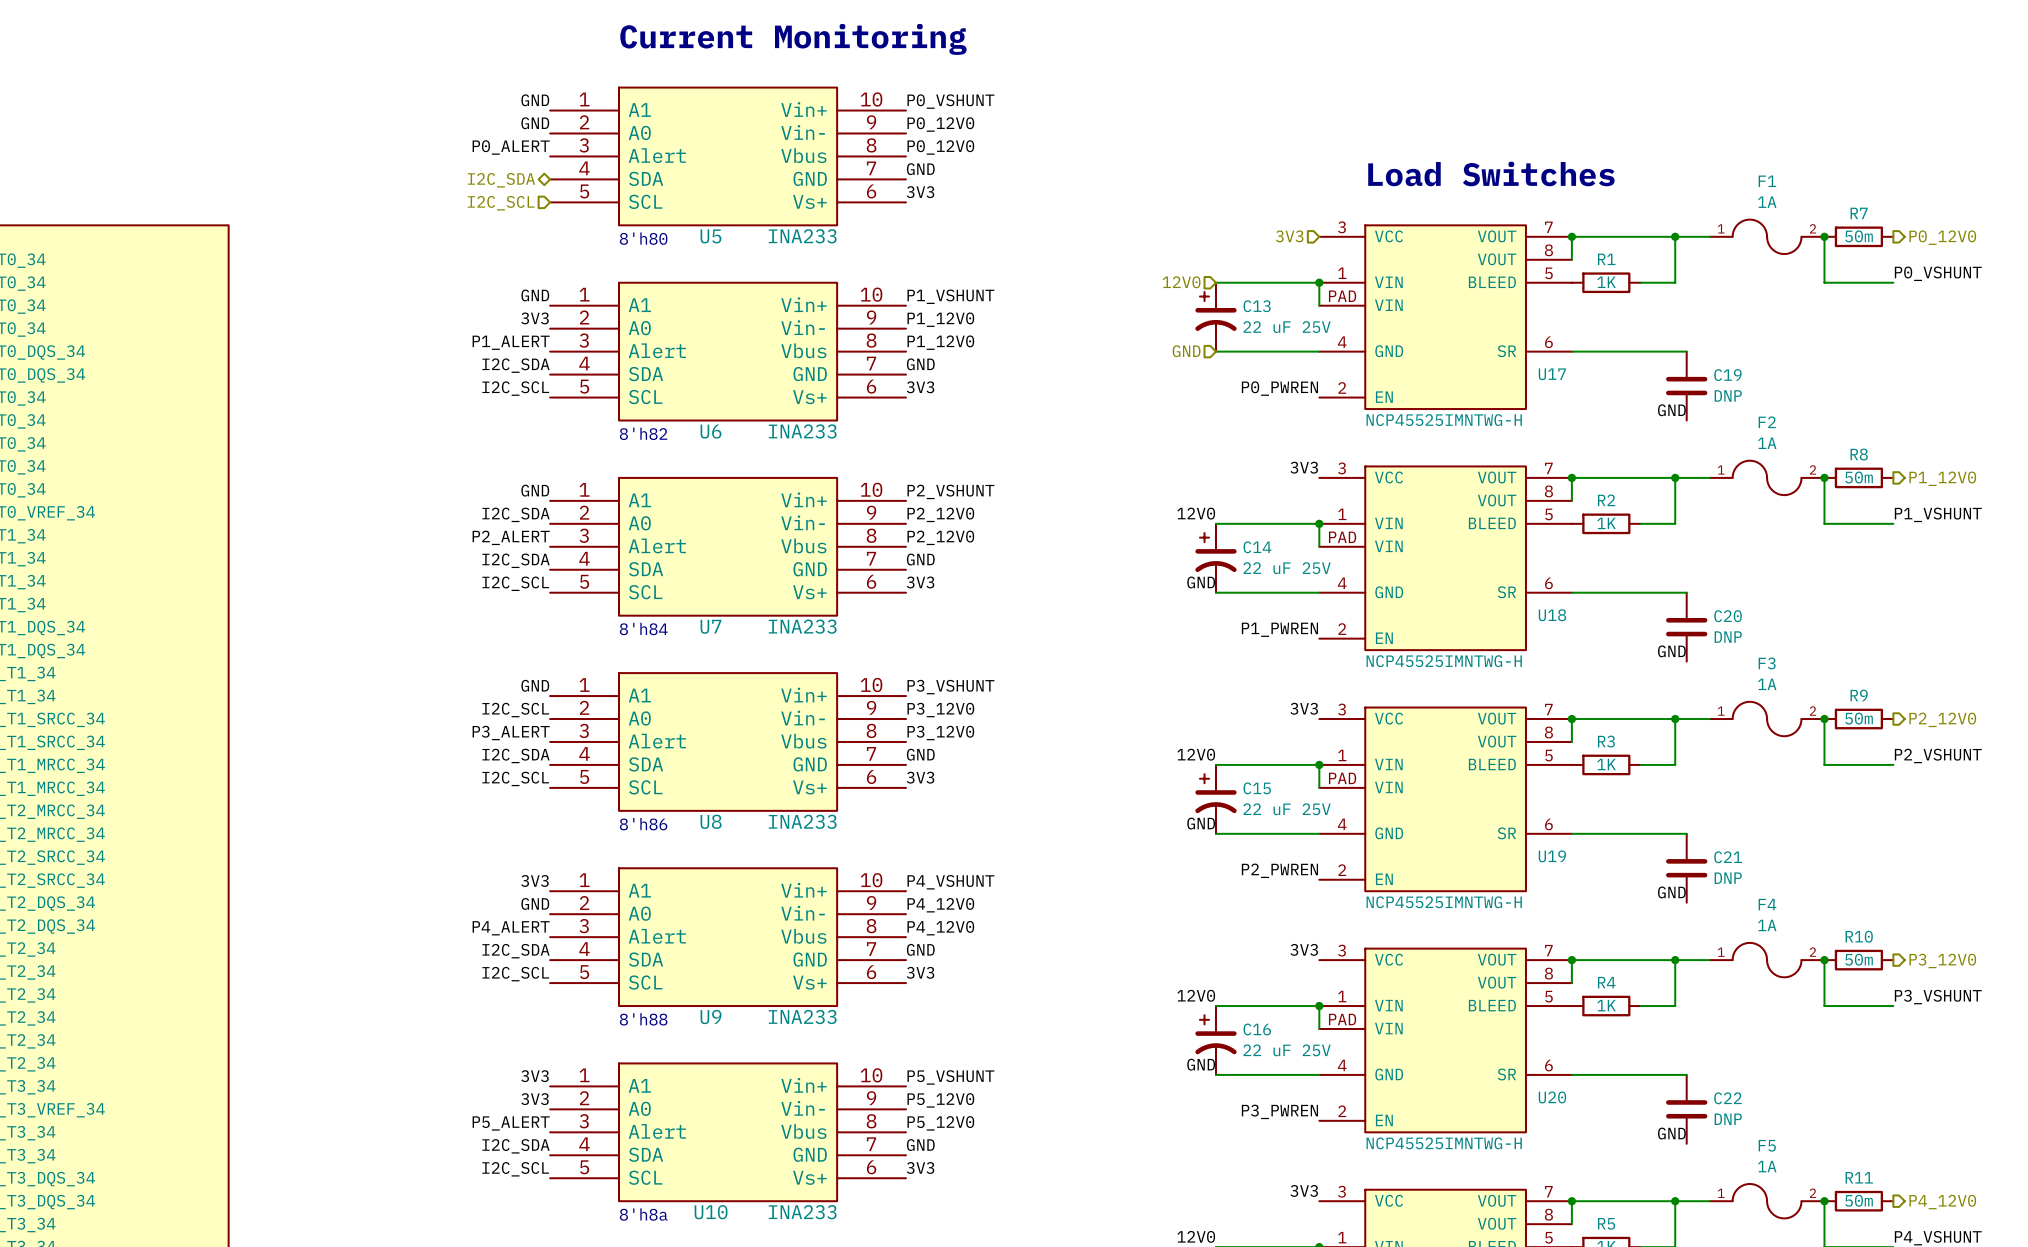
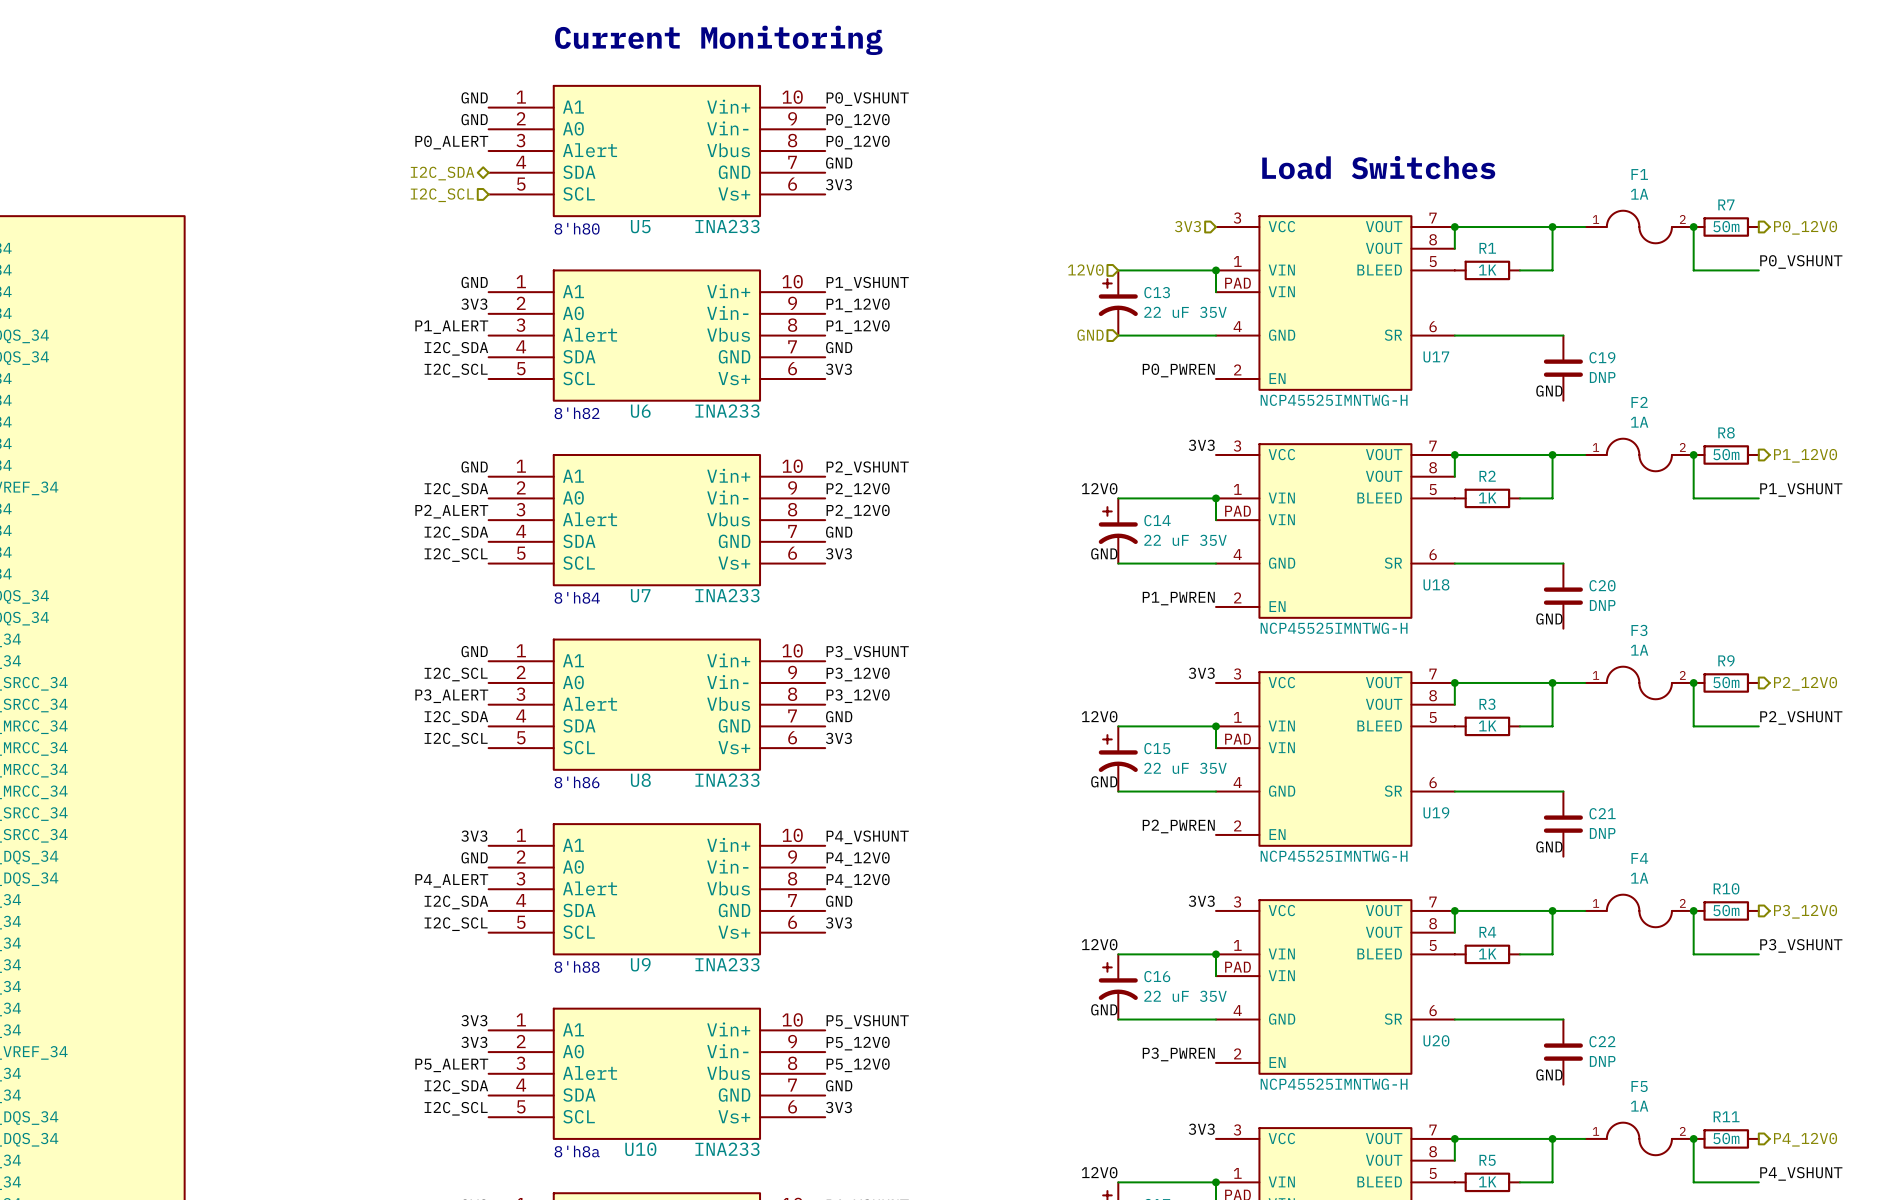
C13 value: 22 uF 25V (1287, 327) -> 22 uF 35V (1185, 312)
C14 value: 22 uF 25V (1287, 568) -> 22 uF 35V (1185, 540)
C15 value: 22 uF 25V (1287, 809) -> 22 uF 35V (1185, 768)
C16 value: 22 uF 25V (1287, 1050) -> 22 uF 35V (1185, 996)

